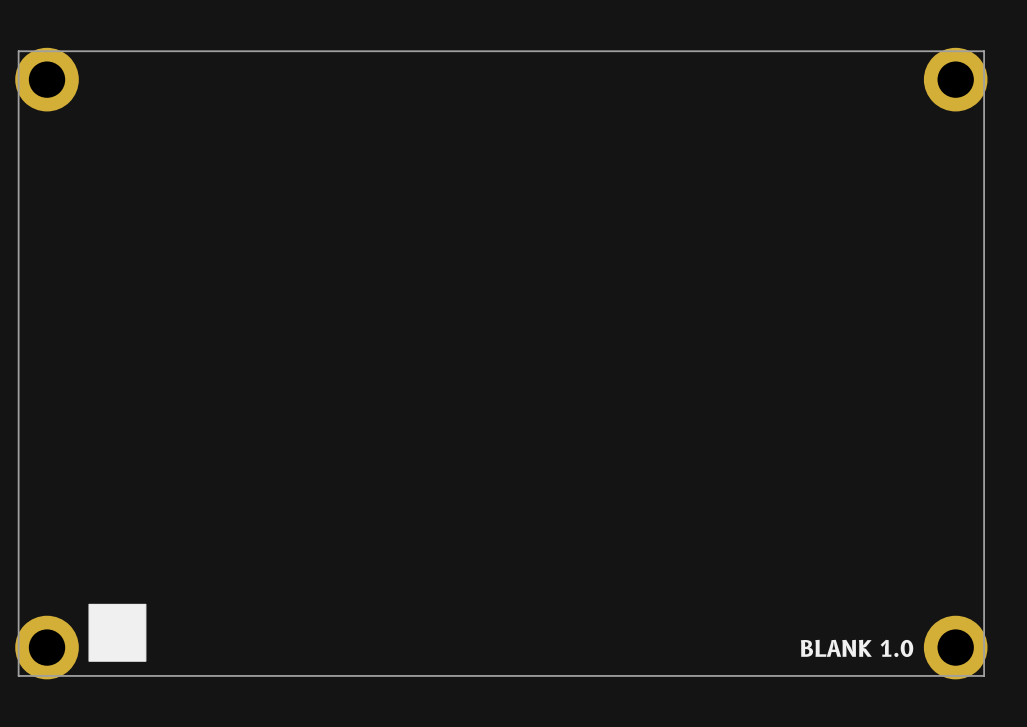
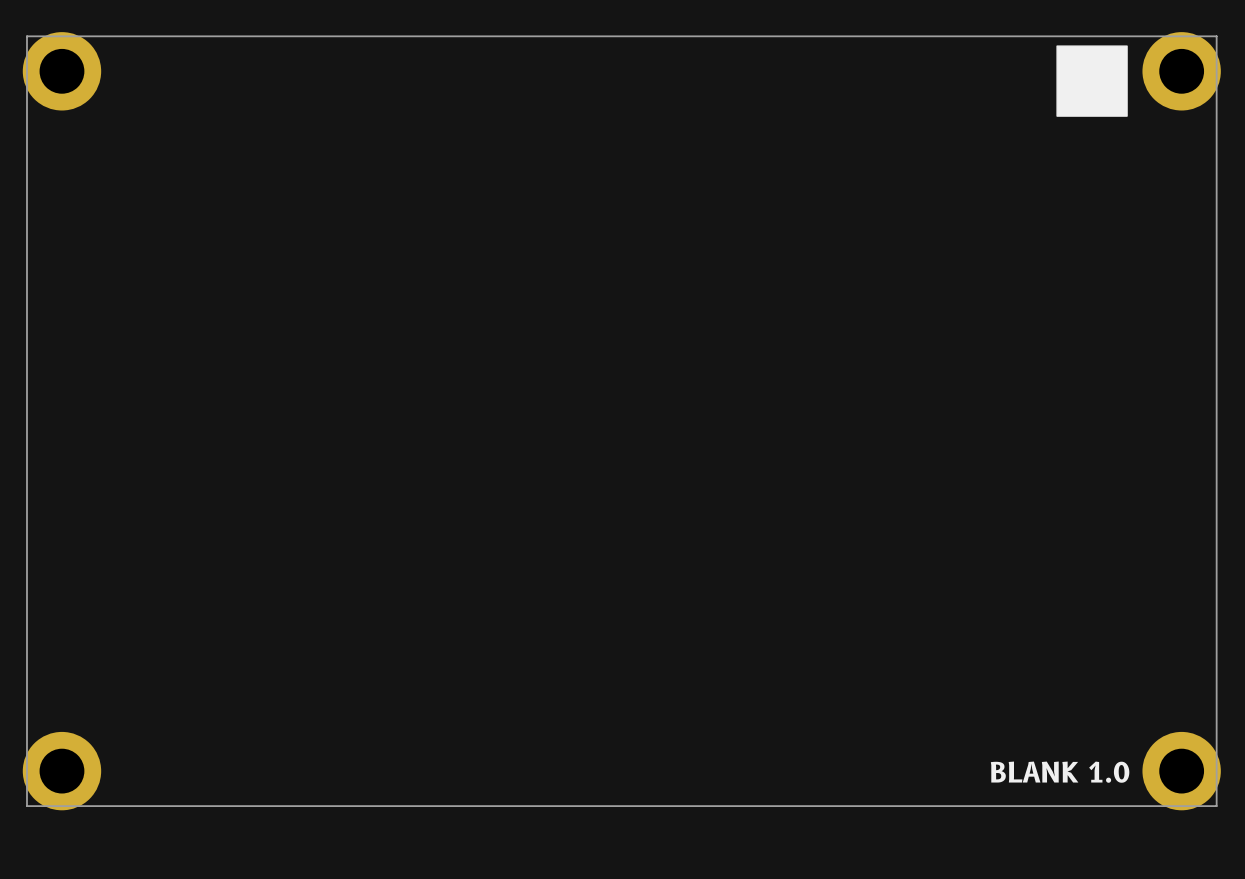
drawing: none -> [1056, 45, 1128, 117]
drawing: [88, 603, 147, 662] -> none

